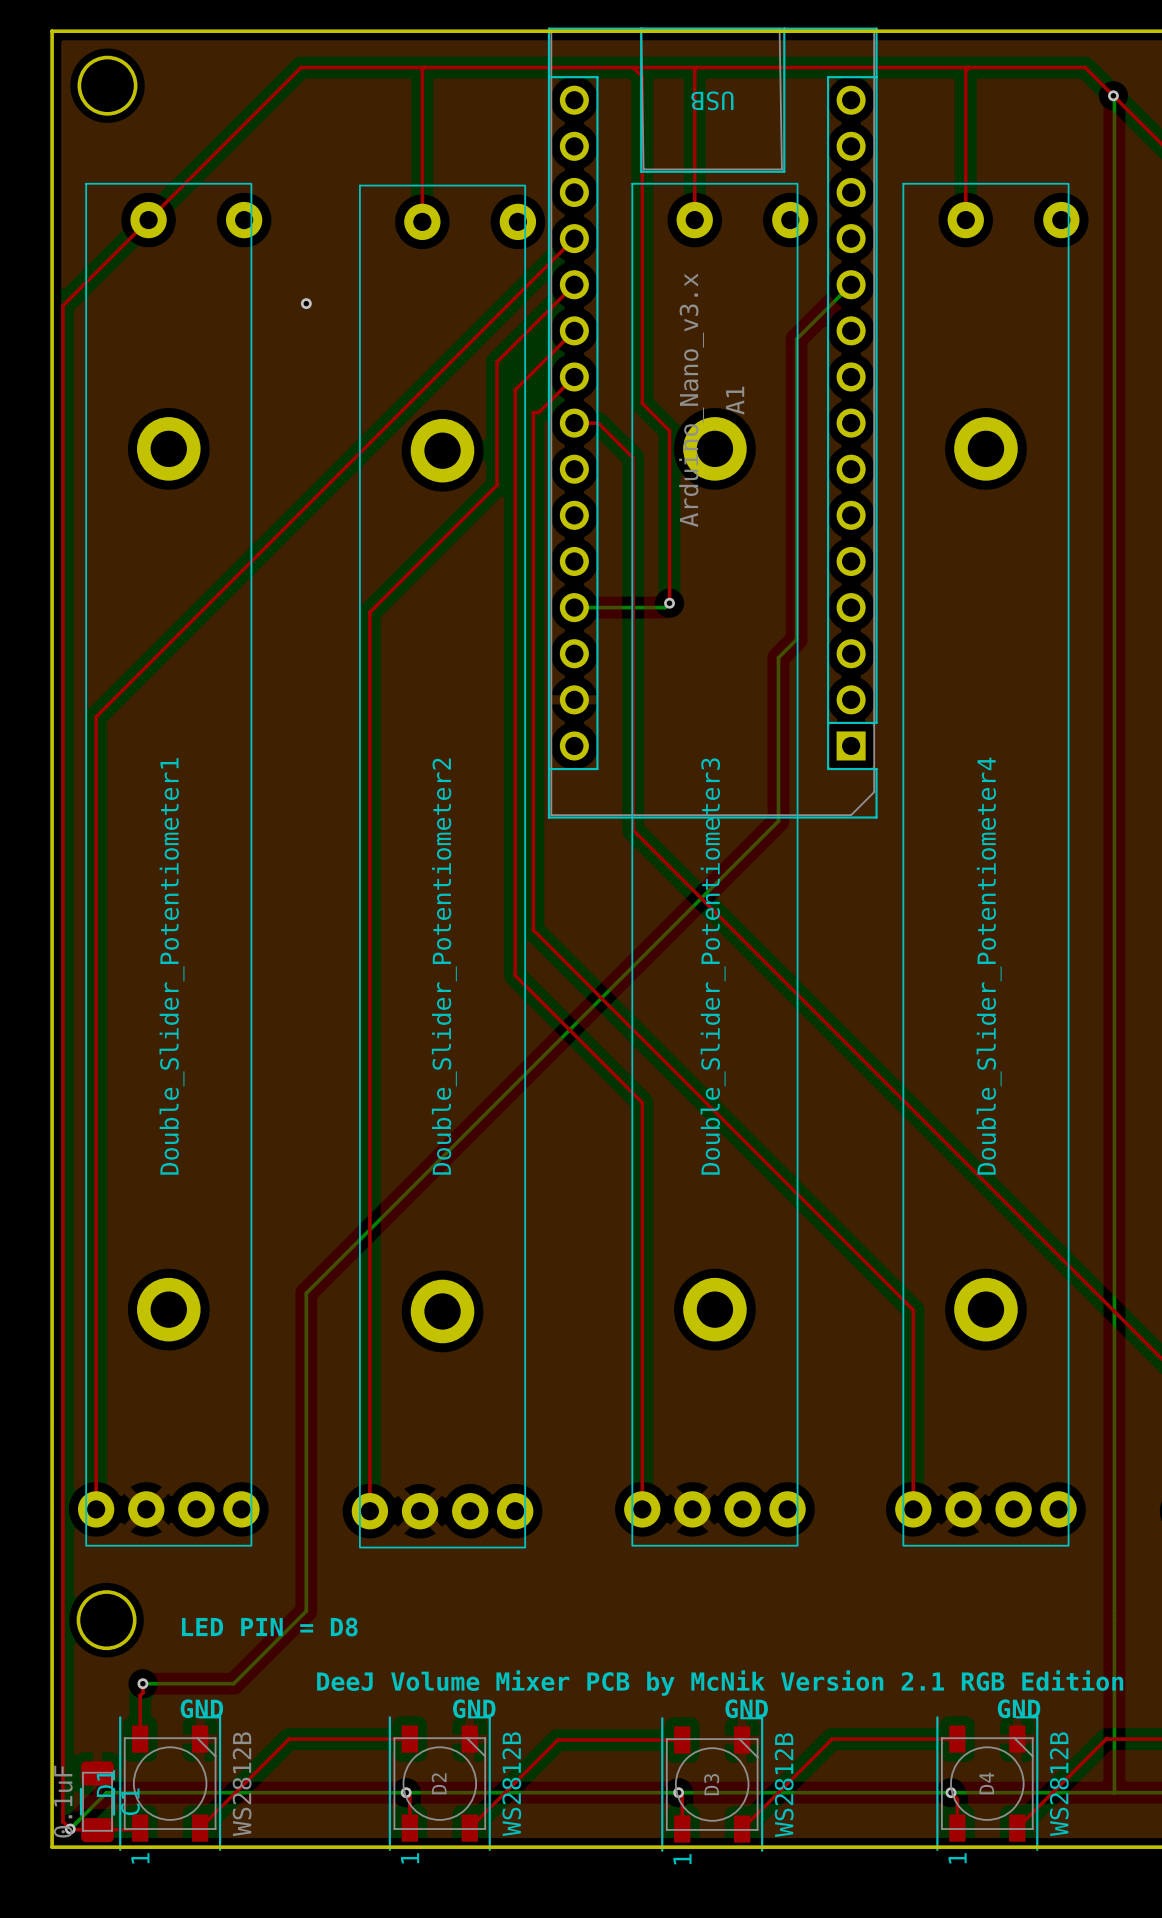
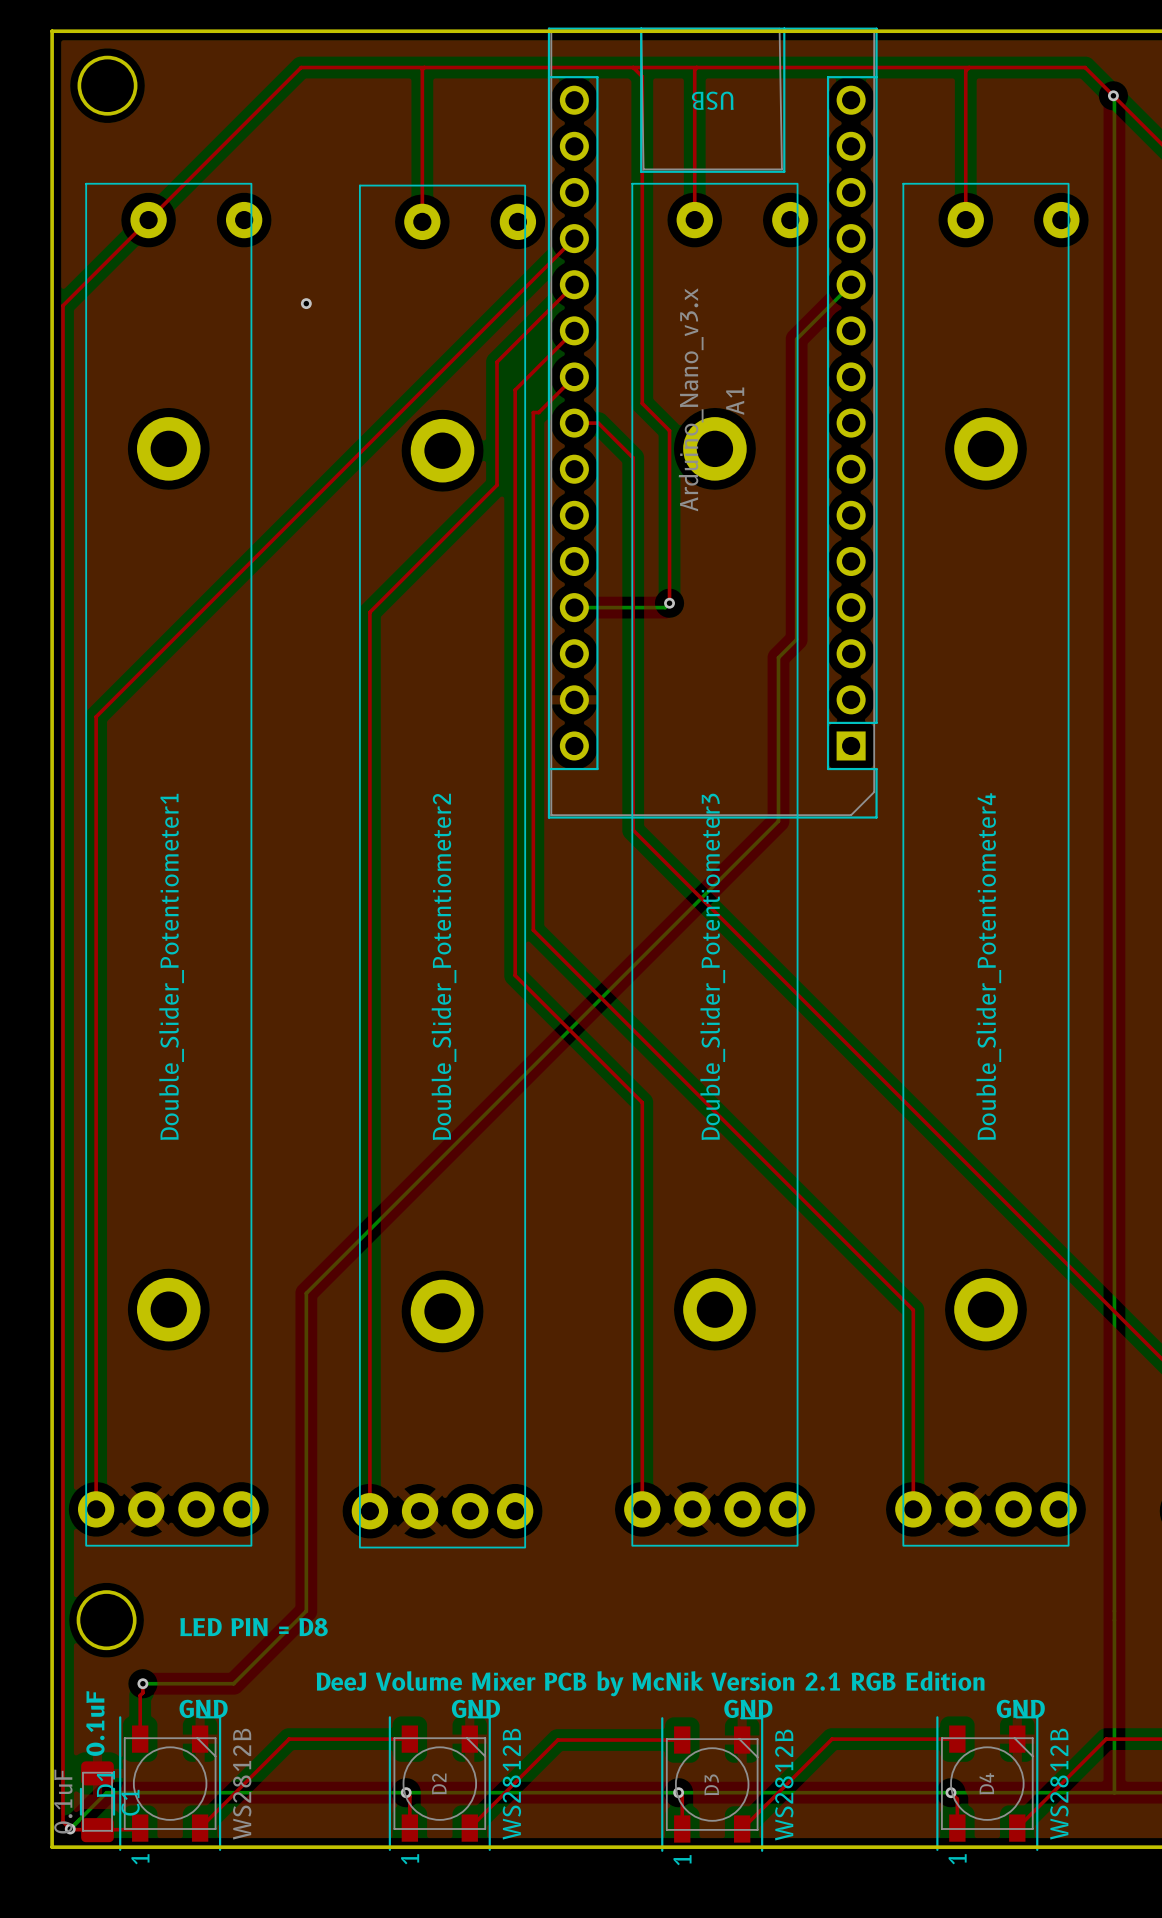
text: none -> 0.1uF (95, 1723)

